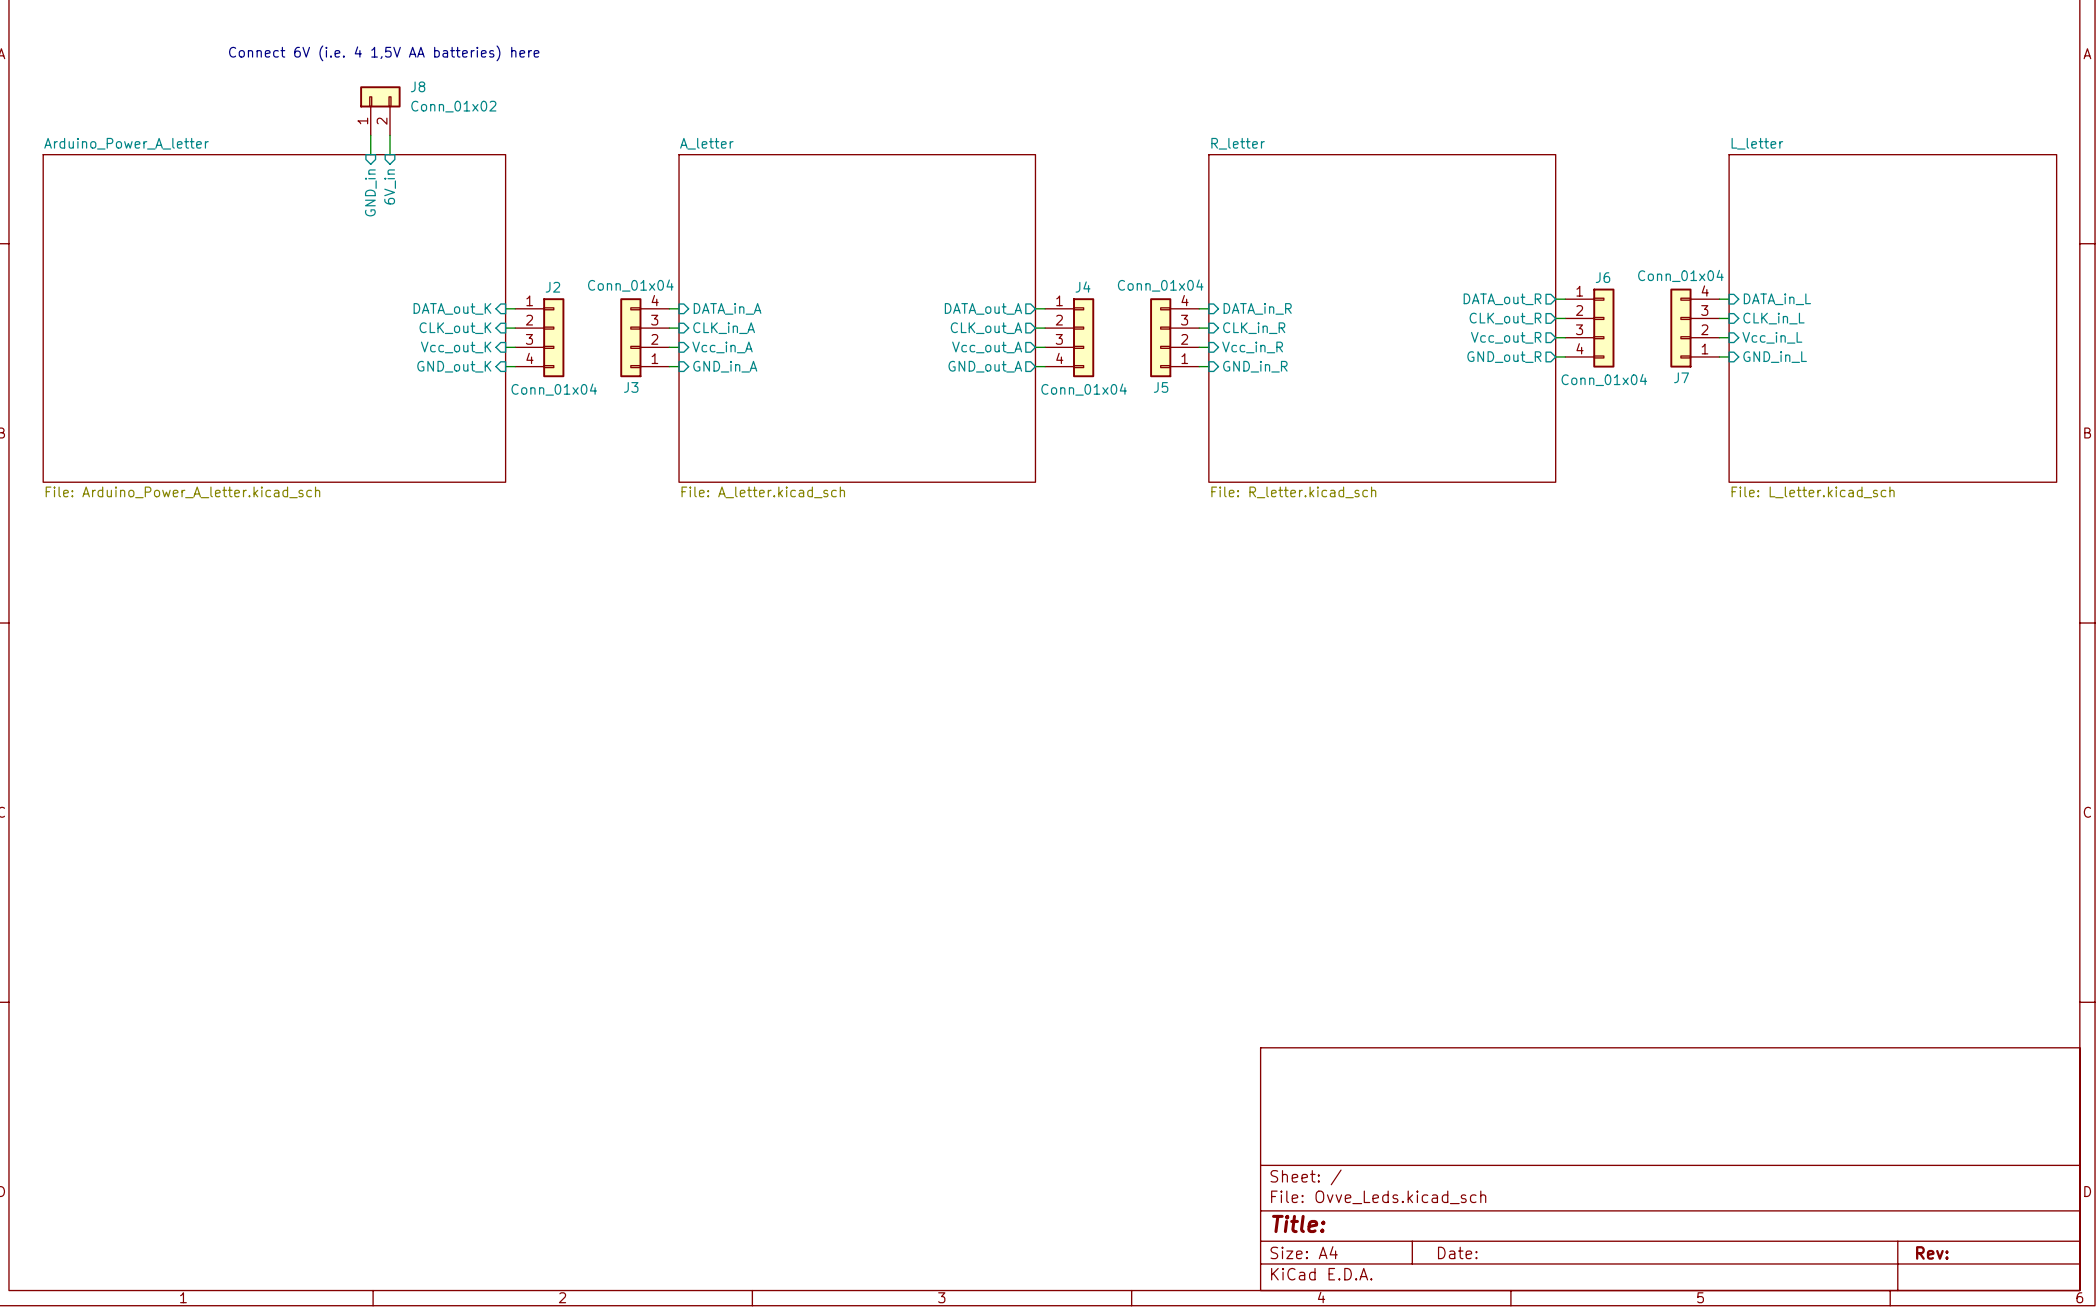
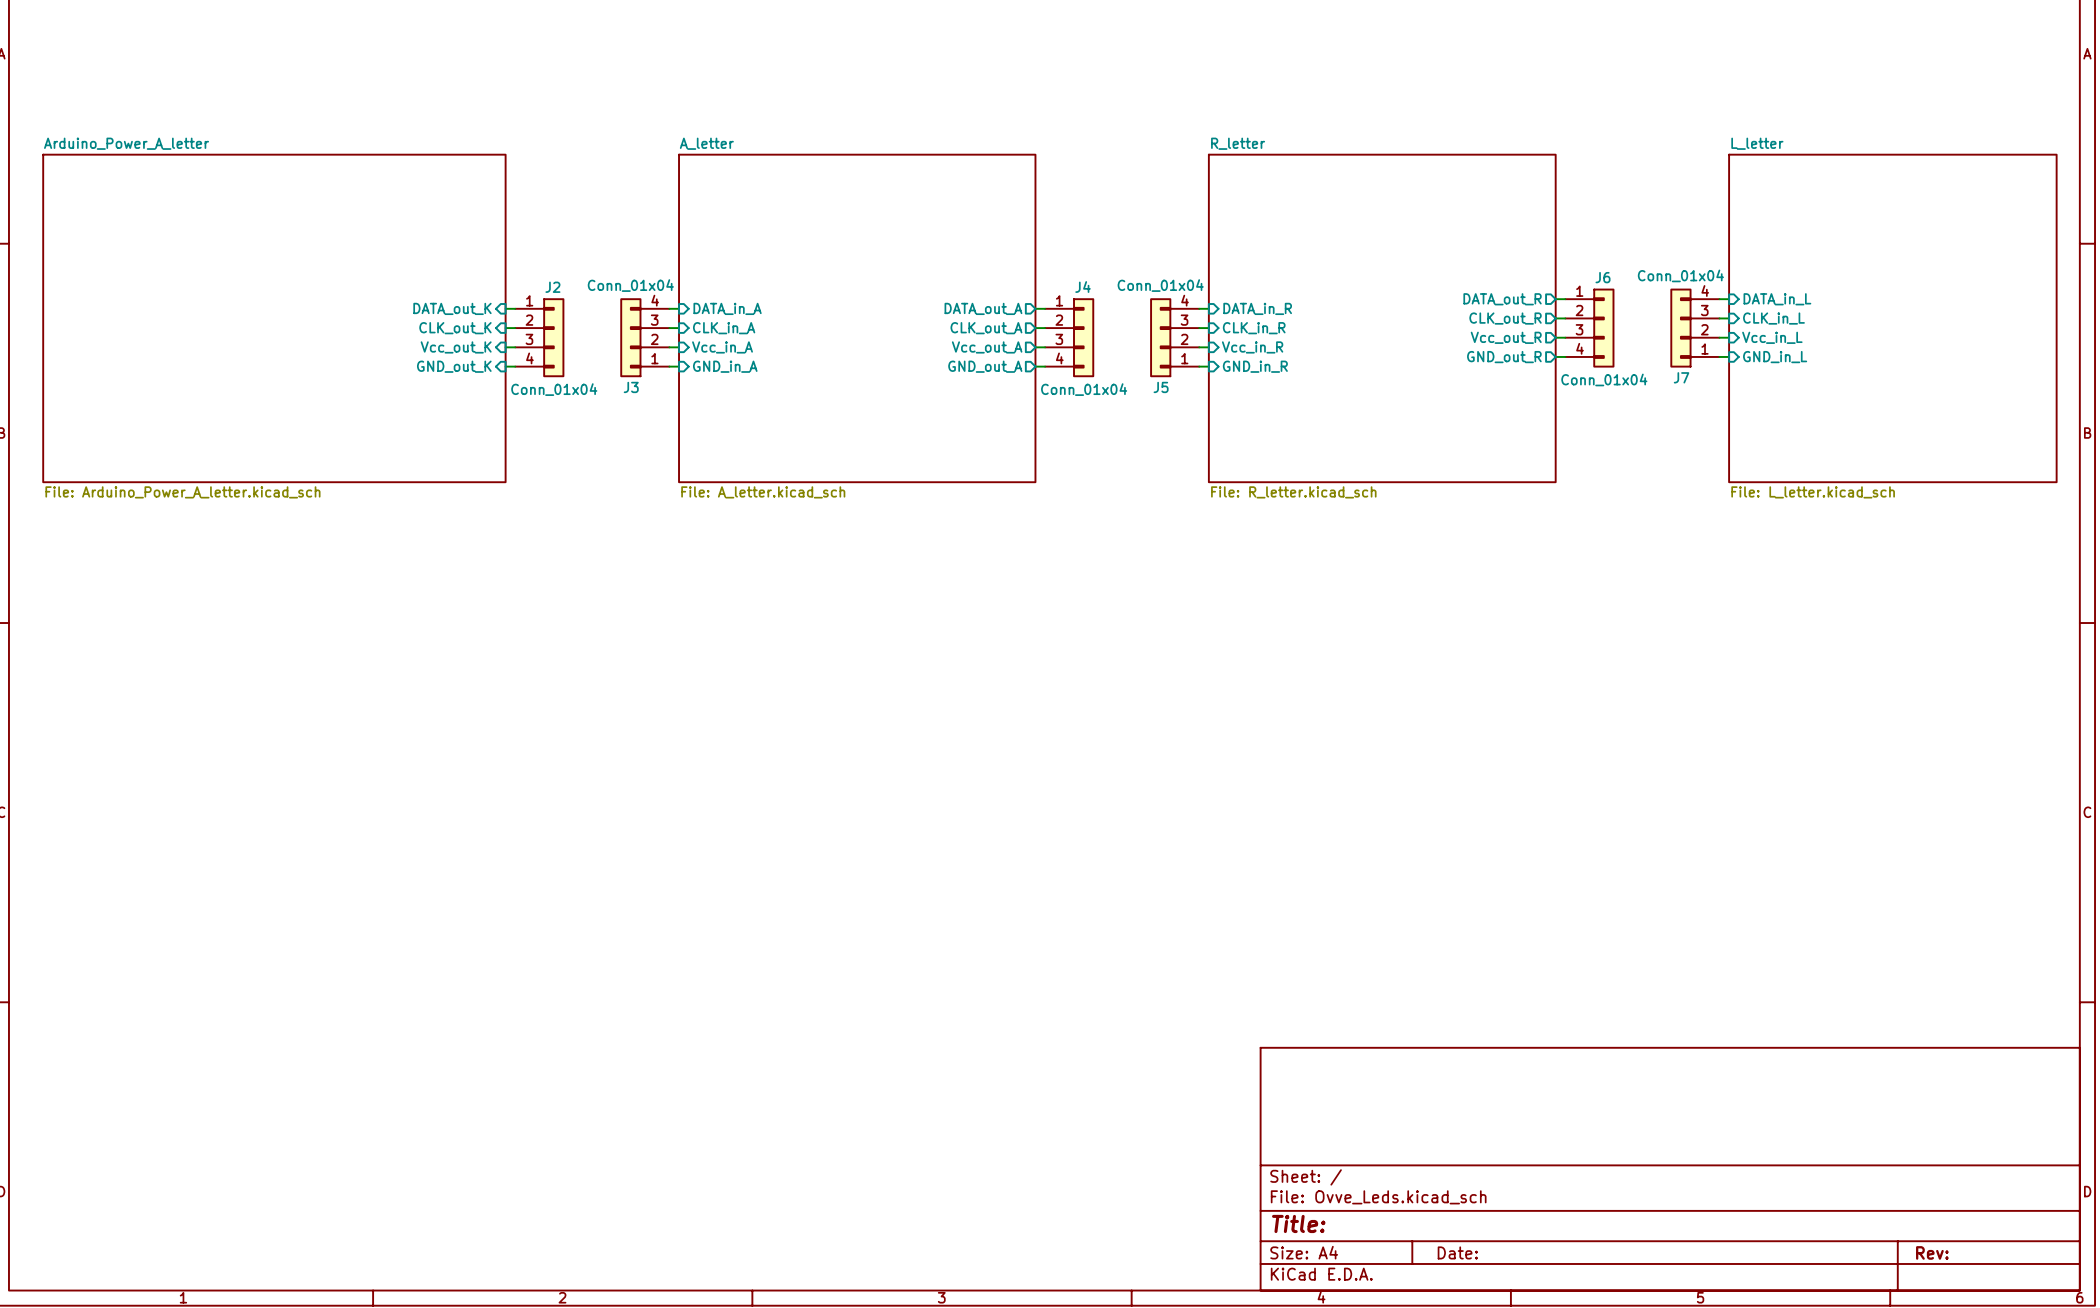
text: Connect 6V (i.e. 4 1,5V AA batteries) here (384, 53) -> none
J8: Conn_01x02 (380, 110) -> none
wire: (370, 135) (370, 154) -> none
wire: (390, 135) (390, 154) -> none
sheet pin: 6V_in (390, 186) -> none
sheet pin: GND_in (370, 192) -> none

